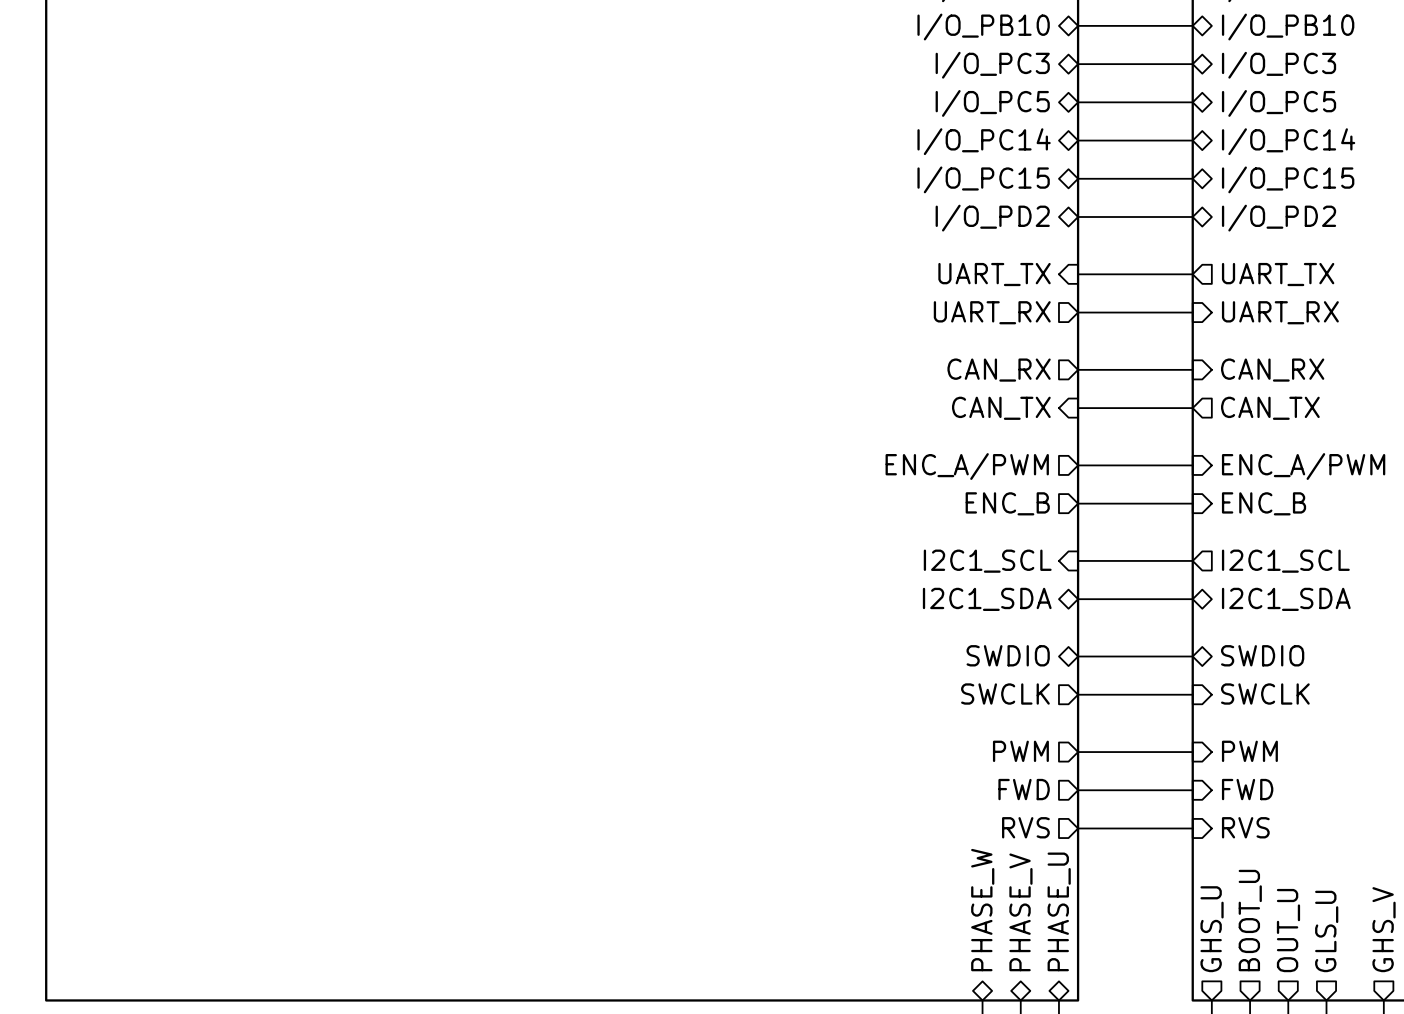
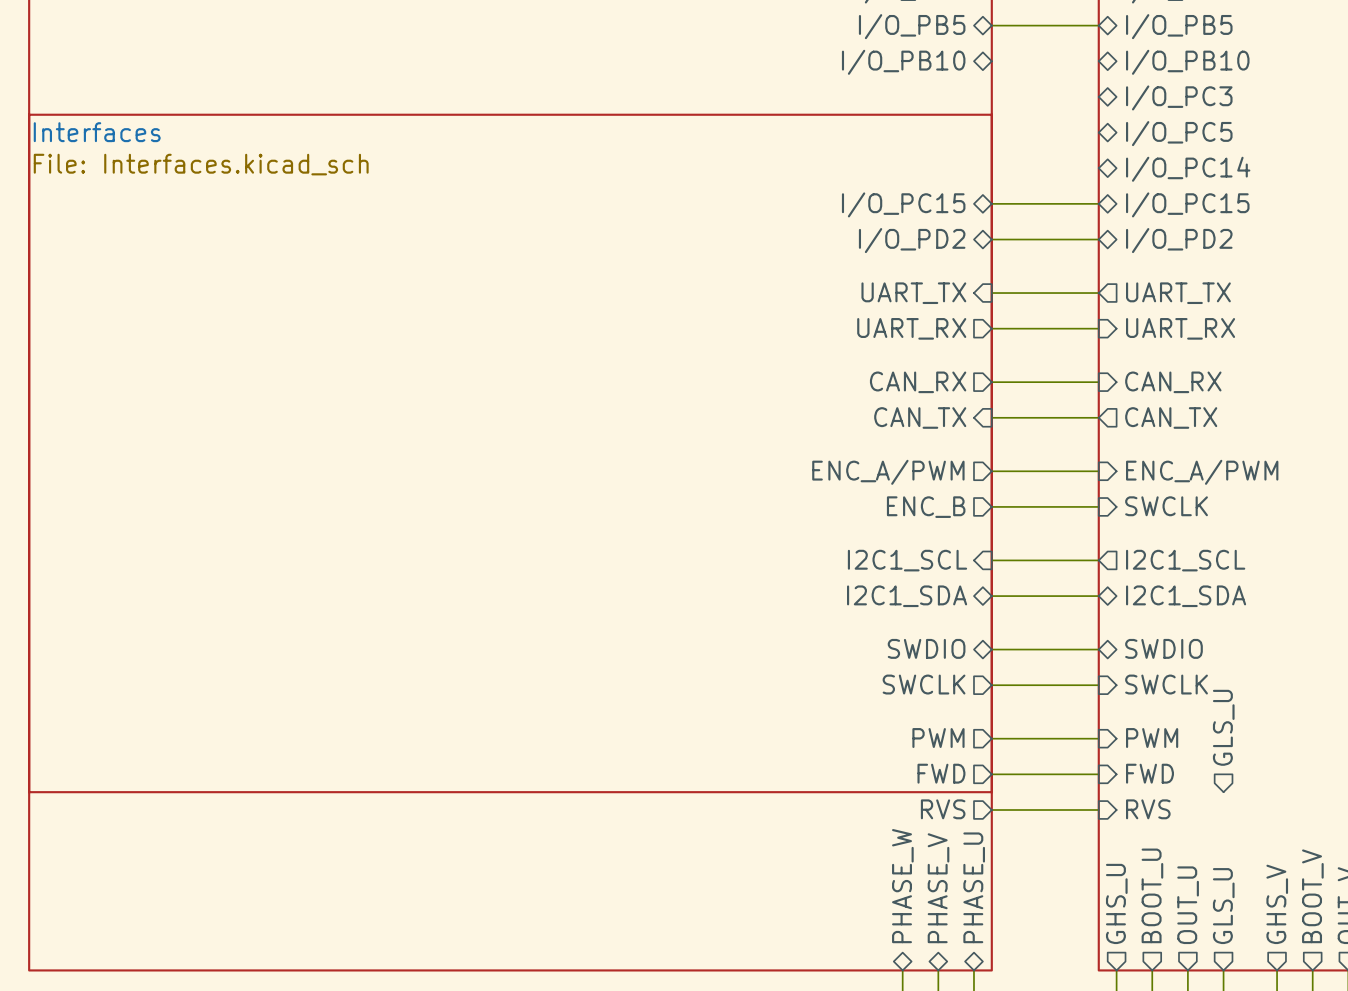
wire: (1078, 25) (1192, 25) -> none
wire: (1078, 64) (1192, 64) -> none
sheet pin: I/O_PC3 (992, 65) -> none
wire: (1078, 102) (1192, 102) -> none
sheet pin: I/O_PC5 (992, 103) -> none
wire: (1078, 140) (1192, 140) -> none
sheet pin: I/O_PC14 (984, 141) -> none
sheet Interfaces: none -> File: Interfaces.kicad_sch (510, 453)
sheet pin: ENC_B (1264, 503) -> SWCLK (1166, 506)
sheet pin: none -> GLS_U (1223, 727)

